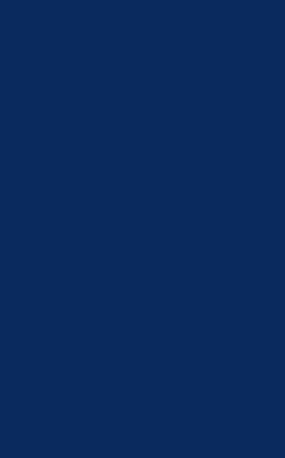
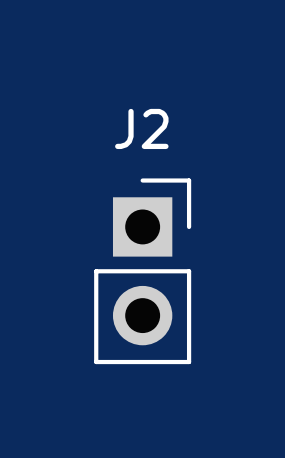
J2: none -> (142, 271)

